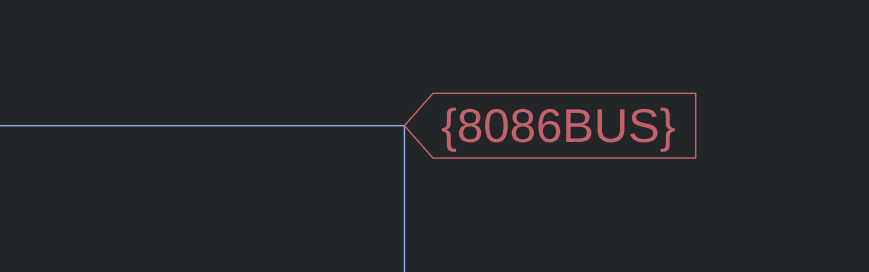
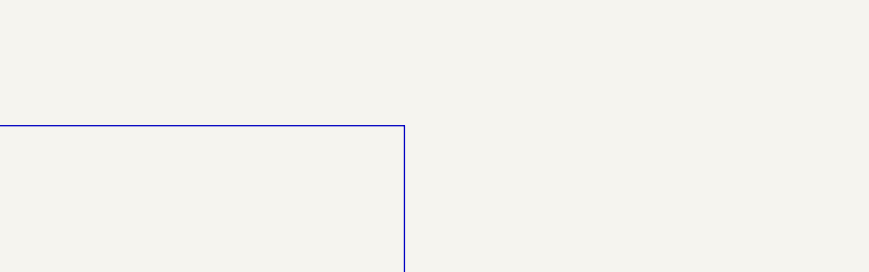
global label: {8086BUS} (558, 129) -> none

